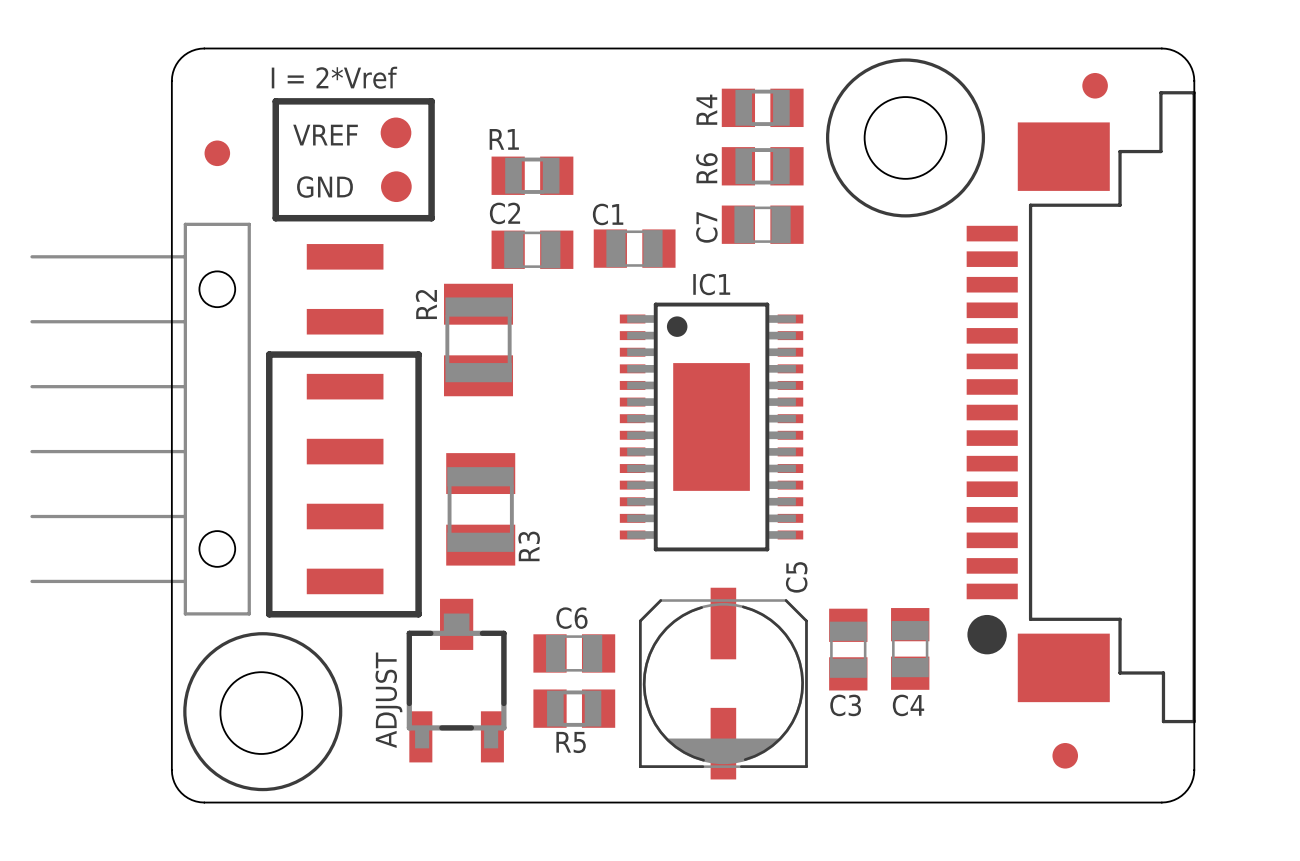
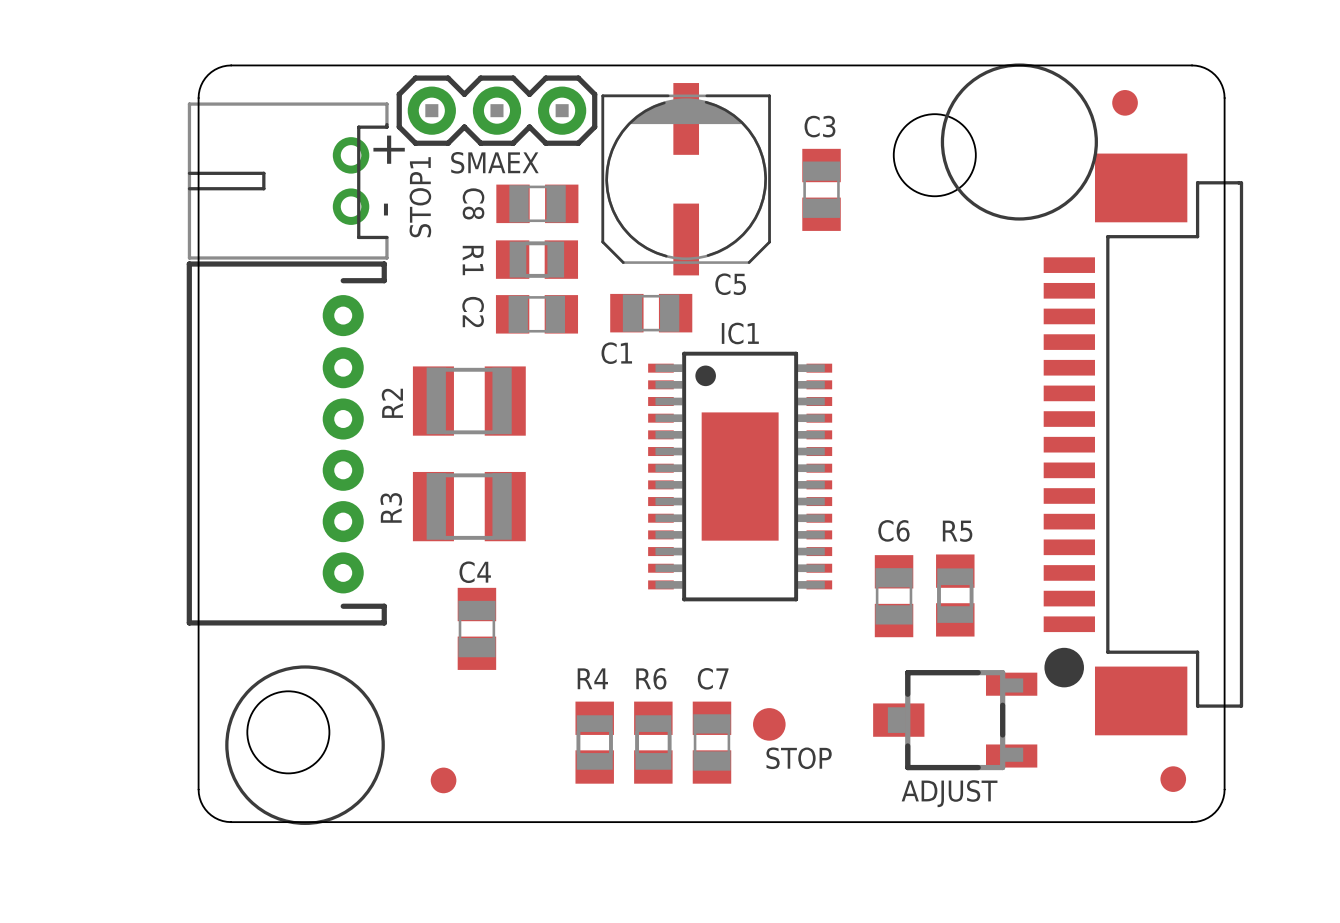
drawing: none -> [940, 63, 1098, 221]
drawing: [825, 58, 986, 218] -> none
text: I = 2*Vref (334, 77) -> none
SMAEX: none -> (496, 110)
line: (275, 101) (431, 101) (431, 218) (275, 218) (275, 101) -> none
R4 rotation: 0° (762, 107) -> 90° clockwise (594, 742)
R4 position: (762, 107) -> (594, 742)
VREF: (396, 132) -> none
R1 name rotation: 0° (504, 139) -> 90° clockwise (473, 260)
R1 name position: R1 (504, 139) -> R1 (473, 260)
part: (217, 153) -> none
STOP1: none -> (288, 181)
R6 rotation: 0° (762, 166) -> 90° clockwise (653, 742)
R6 position: (762, 166) -> (653, 742)
R1 position: (532, 175) -> (536, 259)
GND: (396, 186) -> none
C8: none -> (537, 203)
C2 name rotation: 0° (504, 213) -> 90° clockwise (473, 312)
C2 name position: C2 (504, 213) -> C2 (473, 312)
C1 name position: C1 (608, 214) -> C1 (616, 353)
C7 rotation: 0° (762, 224) -> 90° clockwise (711, 742)
C7 position: (762, 224) -> (711, 742)
C1 position: (634, 248) -> (651, 313)
C2 position: (532, 249) -> (536, 314)
R2 rotation: 0° (478, 340) -> 90° clockwise (469, 401)
line: (269, 354) (418, 354) (418, 614) (269, 614) (269, 354) -> none
part: (1081, 407) -> none
part: (206, 419) -> none
part: none -> (286, 443)
IC1 position: (711, 426) -> (740, 476)
part: none -> (1143, 444)
R3 rotation: 0° (480, 509) -> 90° clockwise (469, 506)
R3 name position: R3 (529, 546) -> R3 (391, 507)
C5 name position: C5 (796, 577) -> C5 (730, 284)
C4 position: (910, 648) -> (476, 628)
C3 position: (848, 649) -> (821, 189)
C6 rotation: 0° (574, 653) -> 90° clockwise (894, 596)
C6 position: (574, 653) -> (894, 596)
ADJUST rotation: 0° (456, 680) -> 90° counterclockwise (955, 720)
ADJUST position: (456, 680) -> (955, 720)
C5 rotation: 0° (723, 683) -> 180° (686, 179)
C5 position: (723, 683) -> (686, 179)
STOP: none -> (769, 724)
C3 name position: C3 (845, 705) -> C3 (819, 126)
C4 name position: C4 (908, 705) -> C4 (475, 572)
R5 rotation: 0° (574, 708) -> 90° clockwise (955, 595)
R5 position: (574, 708) -> (955, 595)
drawing position: (262, 711) -> (305, 745)
R5 name position: R5 (571, 742) -> R5 (957, 531)
part position: (1065, 755) -> (1173, 779)
part: none -> (443, 780)

